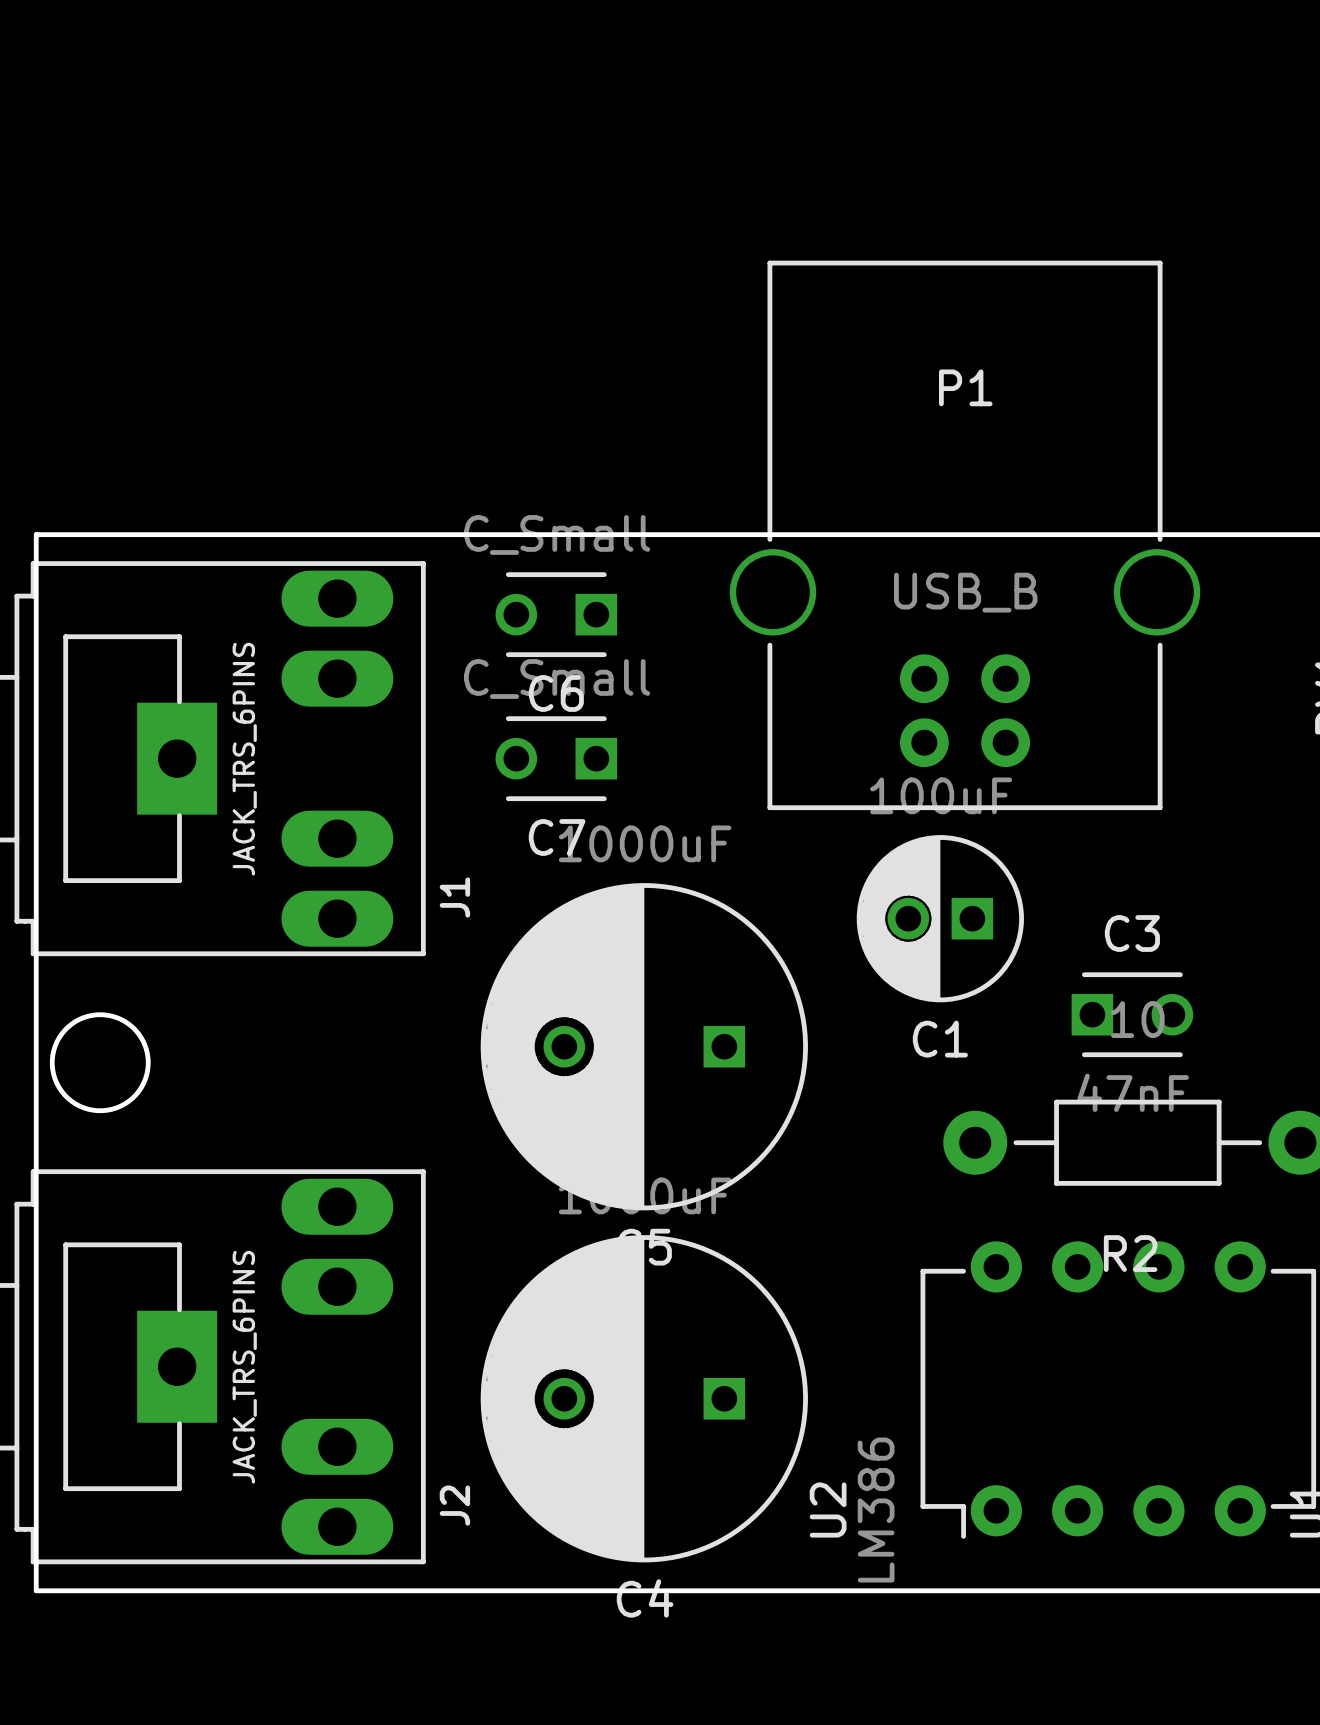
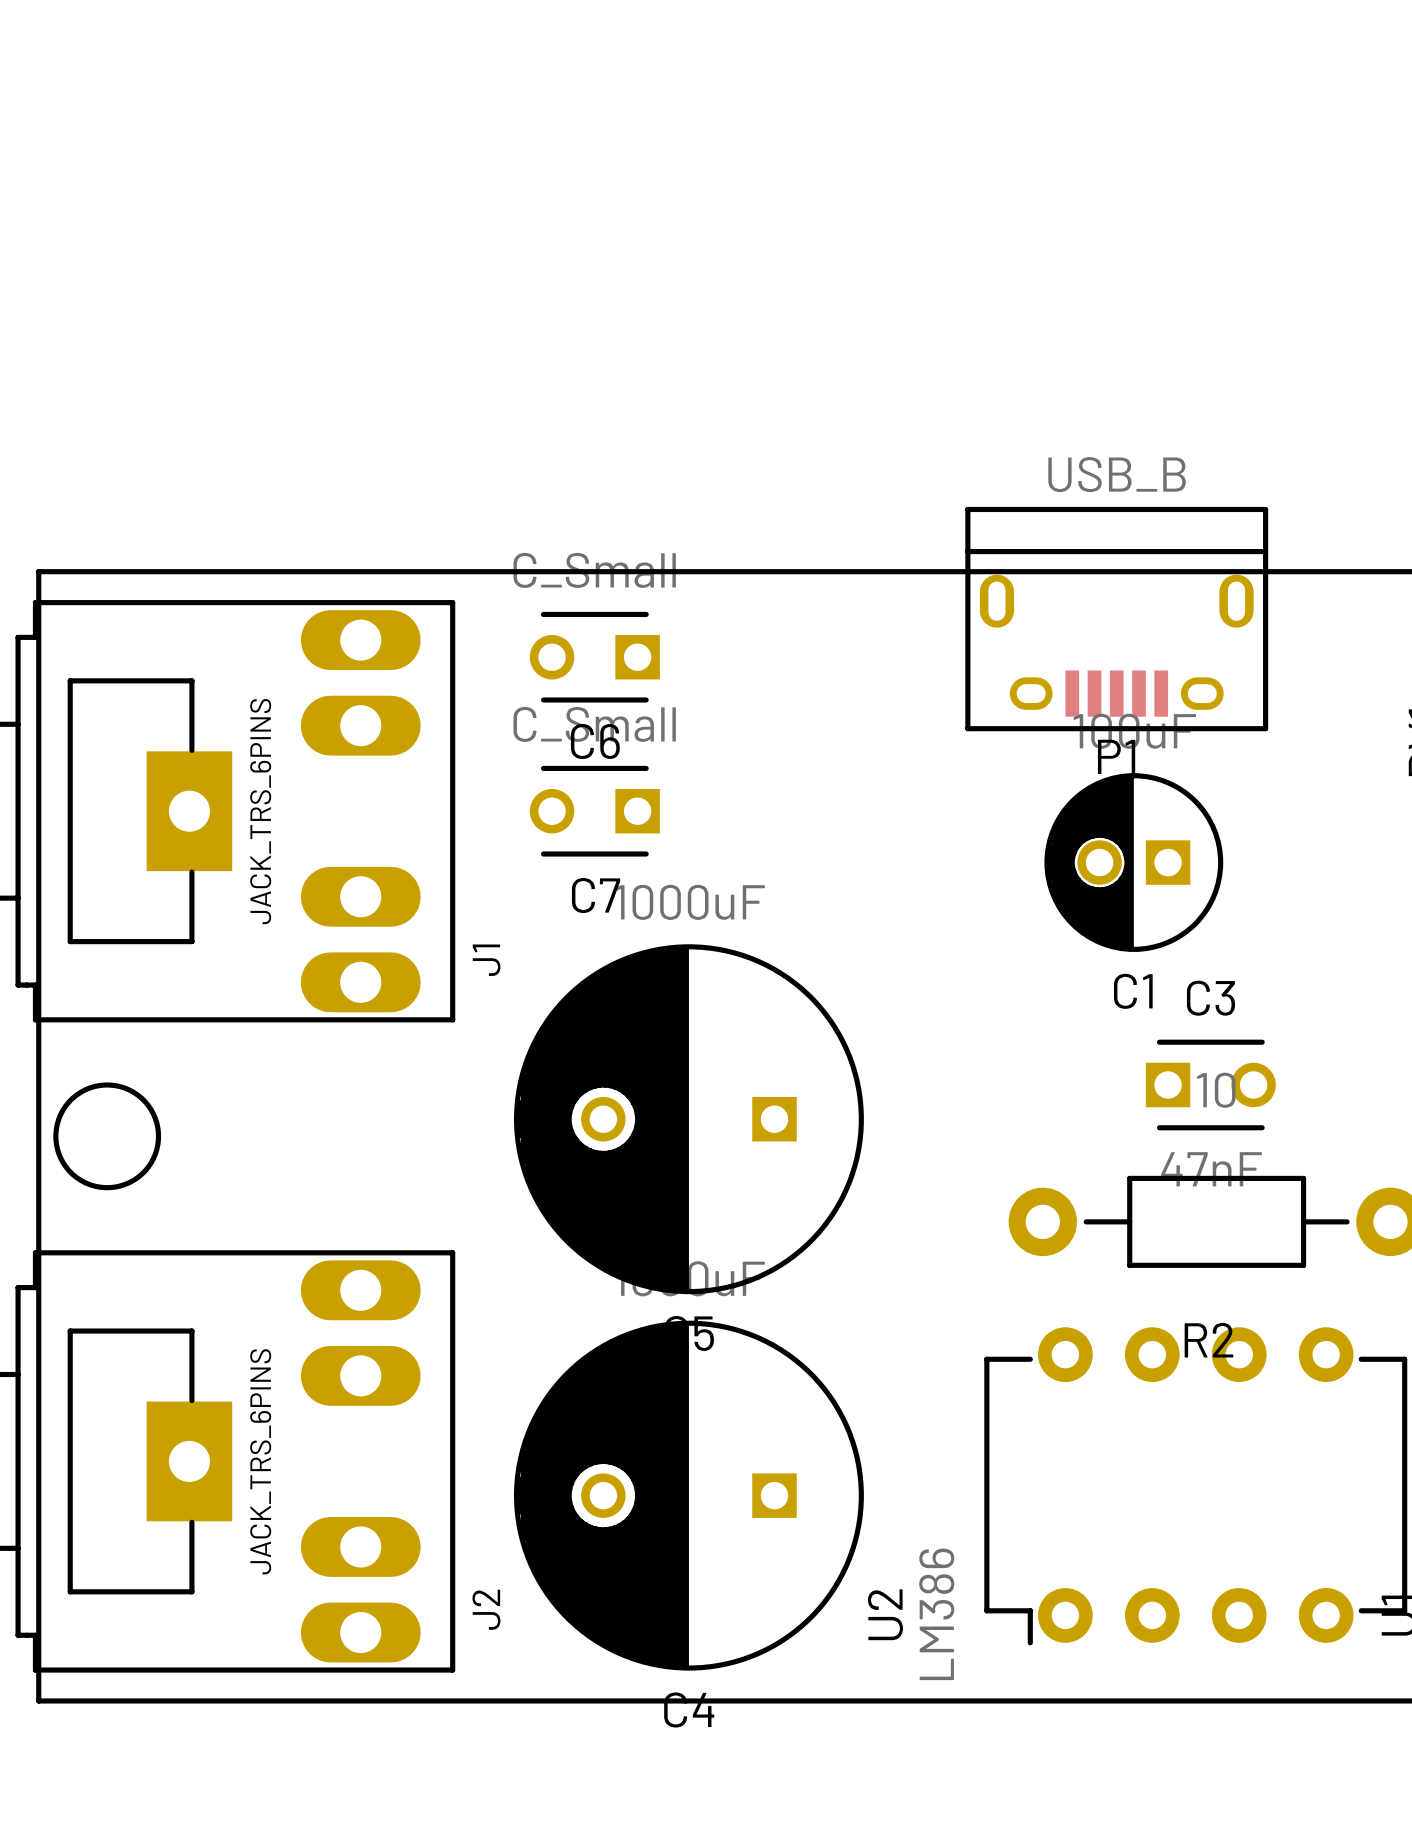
P1 footprint: [729, 260, 1201, 811] -> [965, 506, 1269, 732]
P1 name position: P1 (965, 387) -> P1 (1116, 756)
P1 value position: USB_B (965, 592) -> USB_B (1117, 474)
C1 position: (940, 918) -> (1133, 862)

